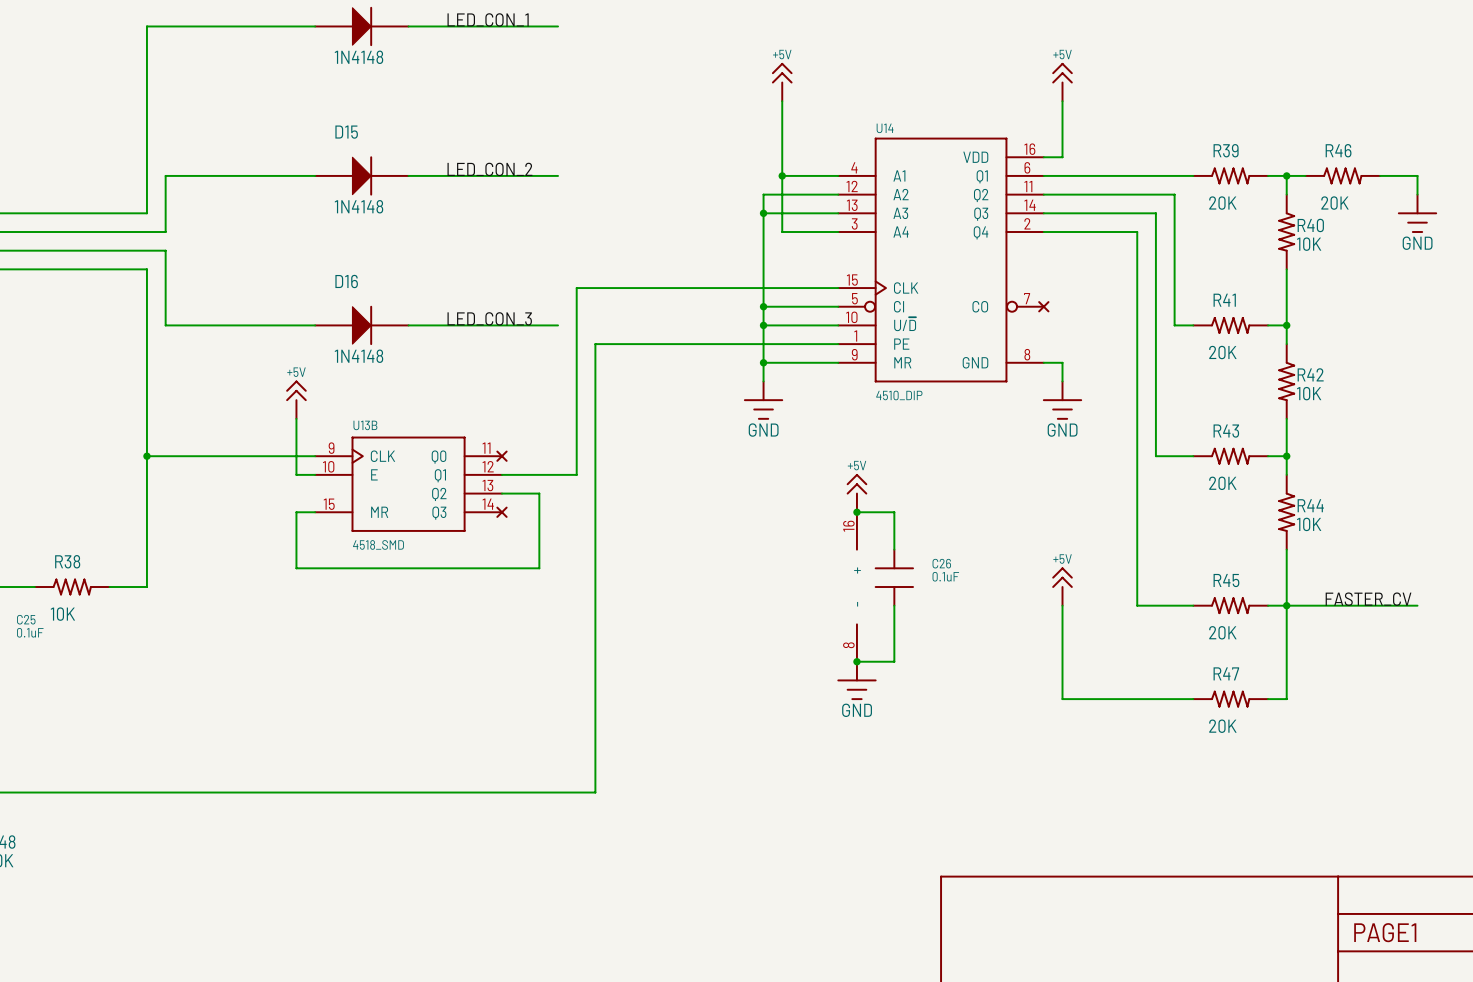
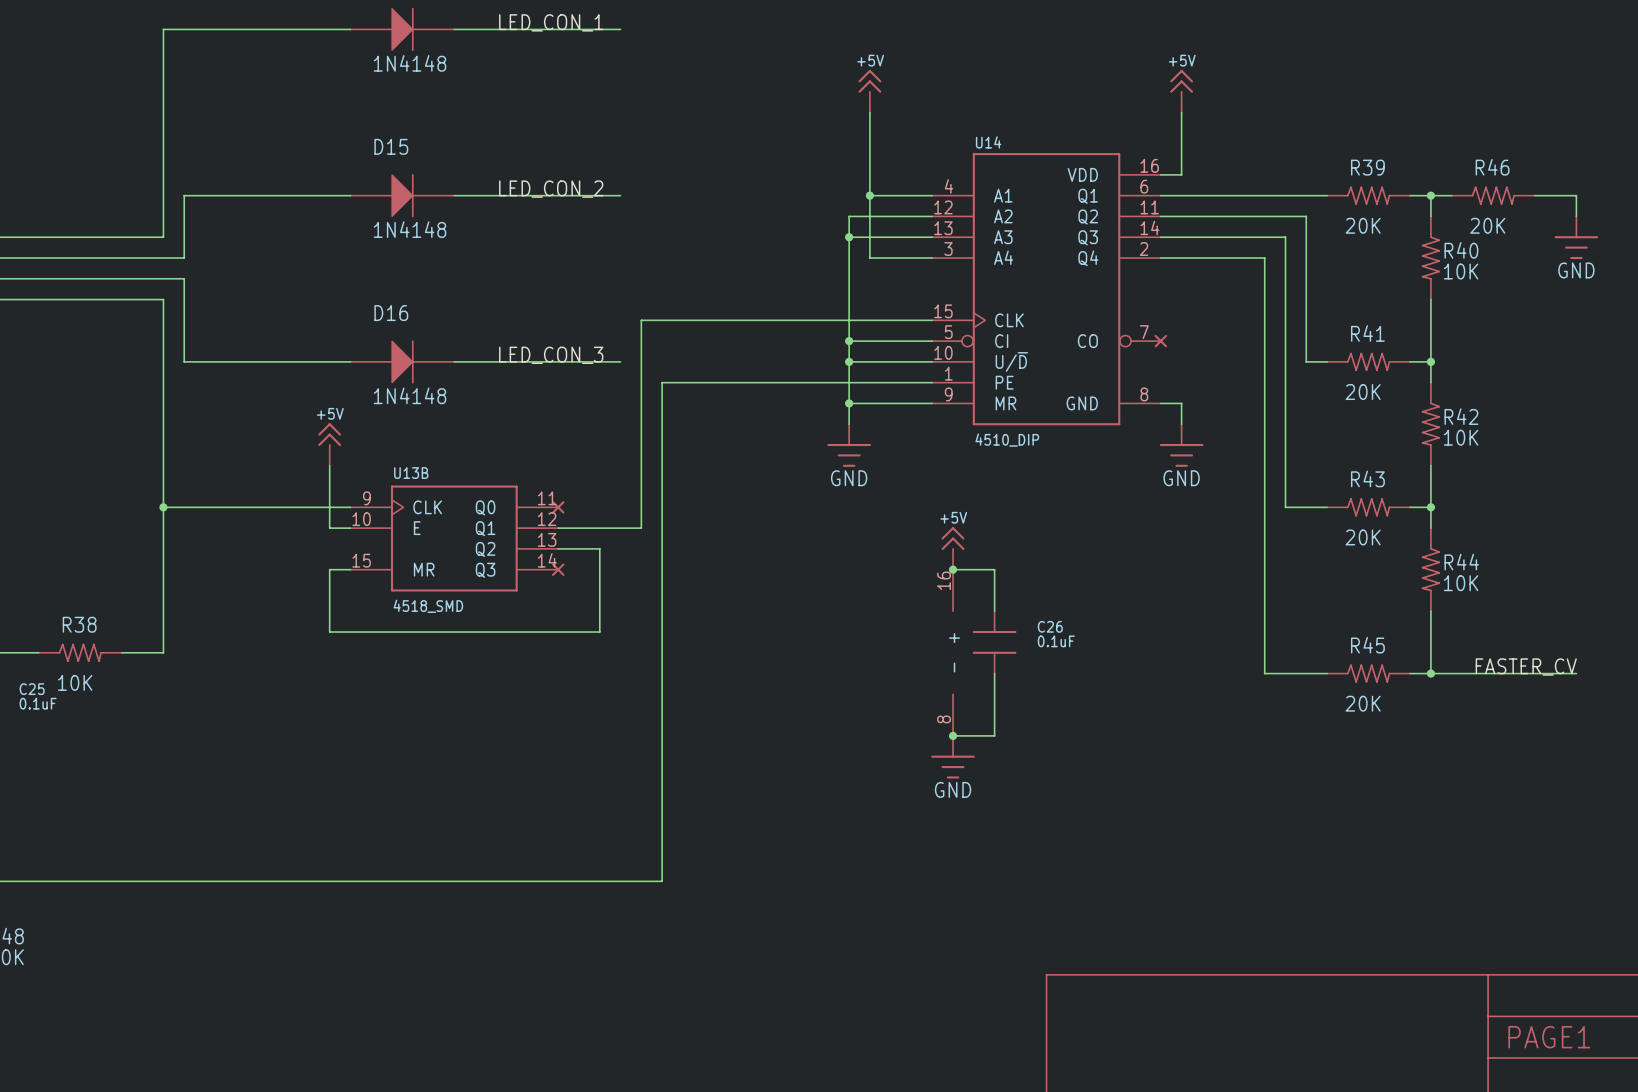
power symbol: +5V (1062, 586) -> none
wire: (1062, 605) (1062, 699) (1193, 699) -> none
wire: (1286, 605) (1286, 699) (1268, 699) -> none
R47: 20K (1230, 699) -> none

